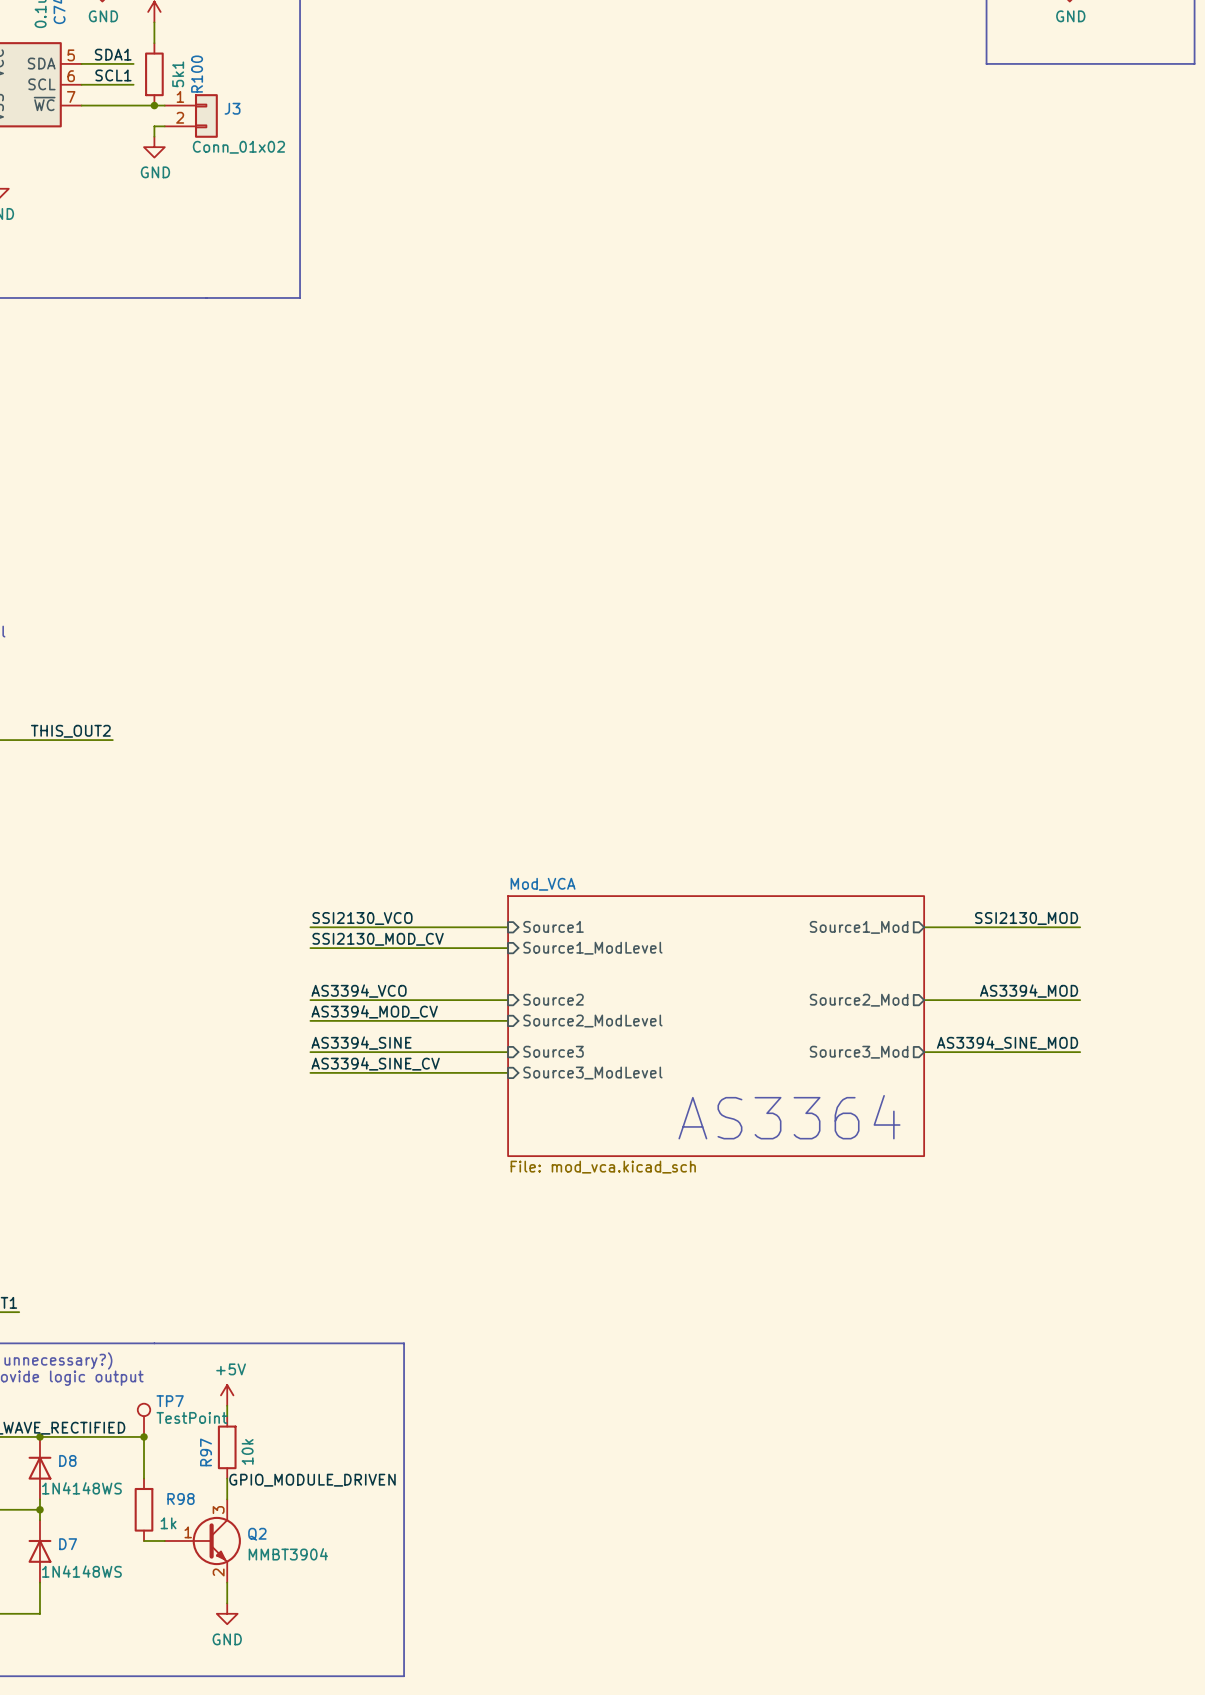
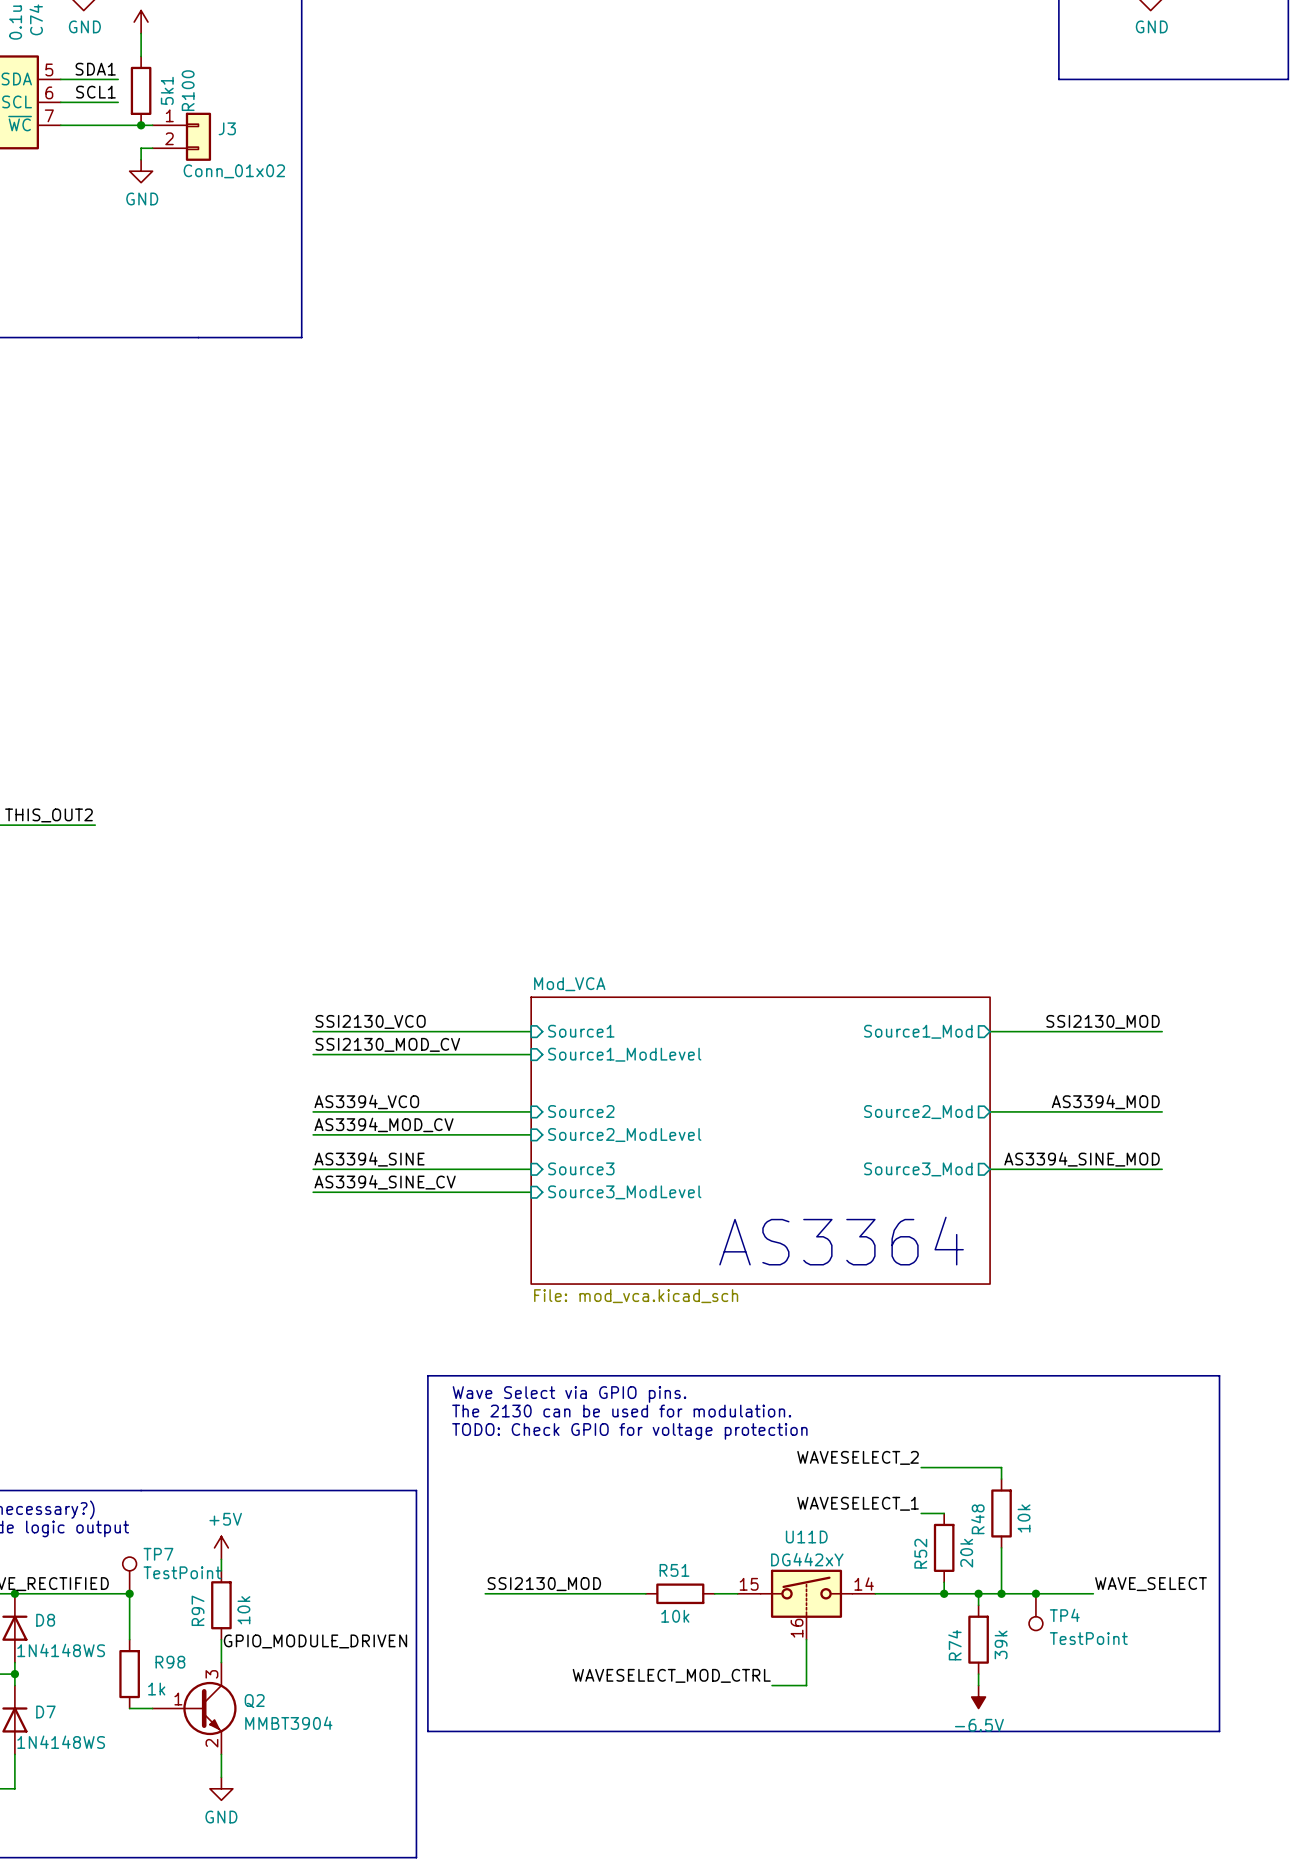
line: none -> (427, 1375) (1219, 1375) (1219, 1731) (427, 1731) (427, 1375)
text: none -> Wave Select via GPIO pins. (569, 1394)
text: none -> The 2130 can be used for modulation. (621, 1411)
text: none -> TODO: Check GPIO for voltage protection (629, 1431)
label: none -> WAVESELECT_2 (858, 1457)
wire: none -> (921, 1467) (1001, 1467) (1001, 1479)
label: none -> WAVESELECT_1 (858, 1503)
wire: none -> (921, 1513) (944, 1513)
R48: none -> 10k (1001, 1513)
R52: none -> 20k (944, 1547)
wire: none -> (1001, 1547) (1001, 1593)
wire: none -> (944, 1582) (944, 1593)
label: none -> SSI2130_MOD (544, 1584)
label: none -> WAVE_SELECT (1151, 1584)
wire: none -> (485, 1593) (645, 1593)
R51: none -> 10k (680, 1593)
wire: none -> (714, 1593) (737, 1593)
wire: none -> (875, 1593) (1093, 1593)
junction: none -> (944, 1593)
wire: none -> (978, 1593) (978, 1605)
junction: none -> (978, 1593)
junction: none -> (1001, 1593)
junction: none -> (1035, 1593)
U11D: none -> DG442xY (806, 1604)
TP4: none -> TestPoint (1035, 1612)
wire: none -> (806, 1639) (806, 1685) (772, 1685)
R74: none -> 39k (978, 1639)
wire: none -> (978, 1674) (978, 1685)
label: none -> WAVESELECT_MOD_CTRL (671, 1675)
power symbol: none -> -6.5V (978, 1697)

